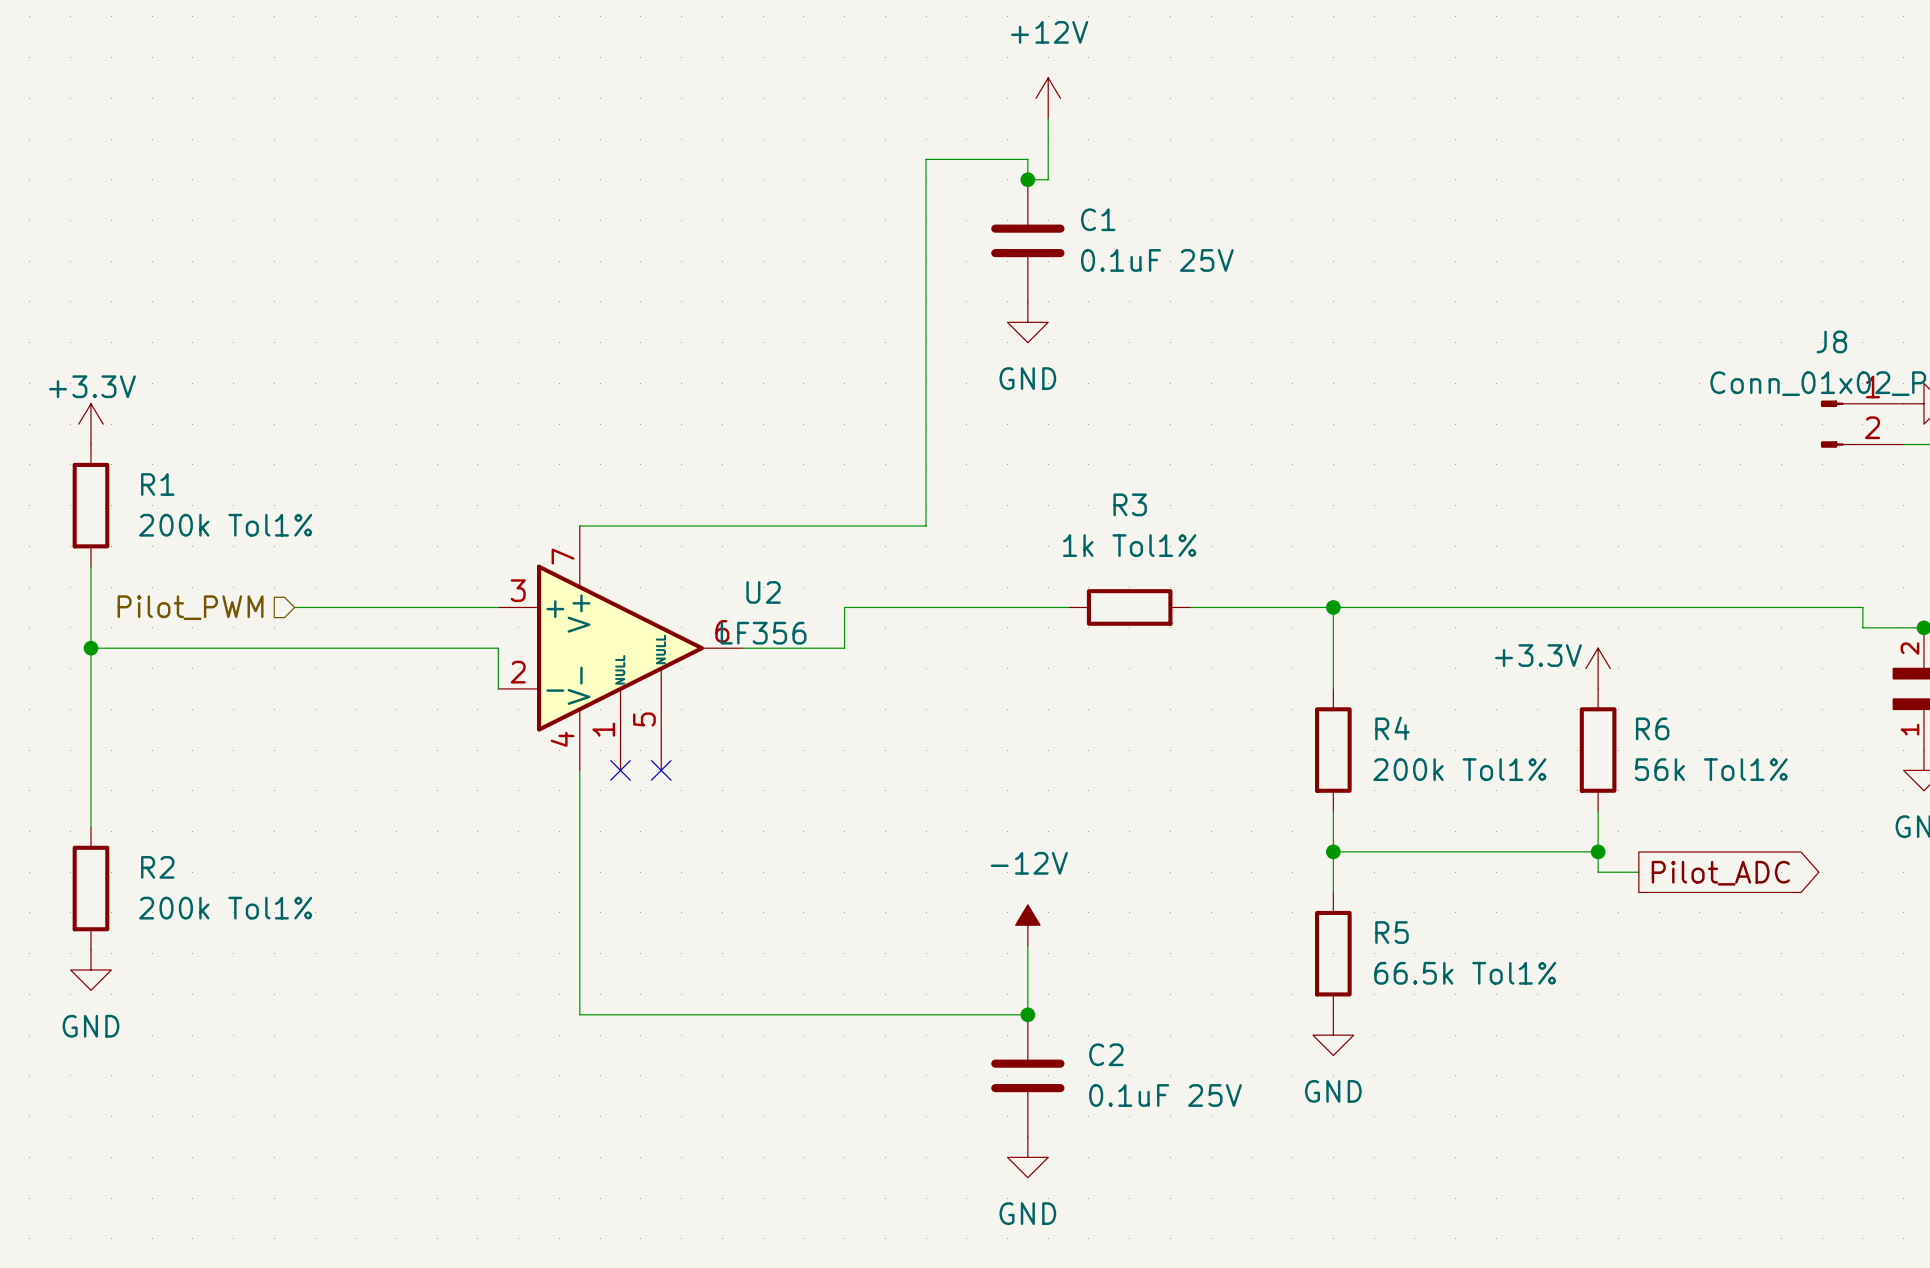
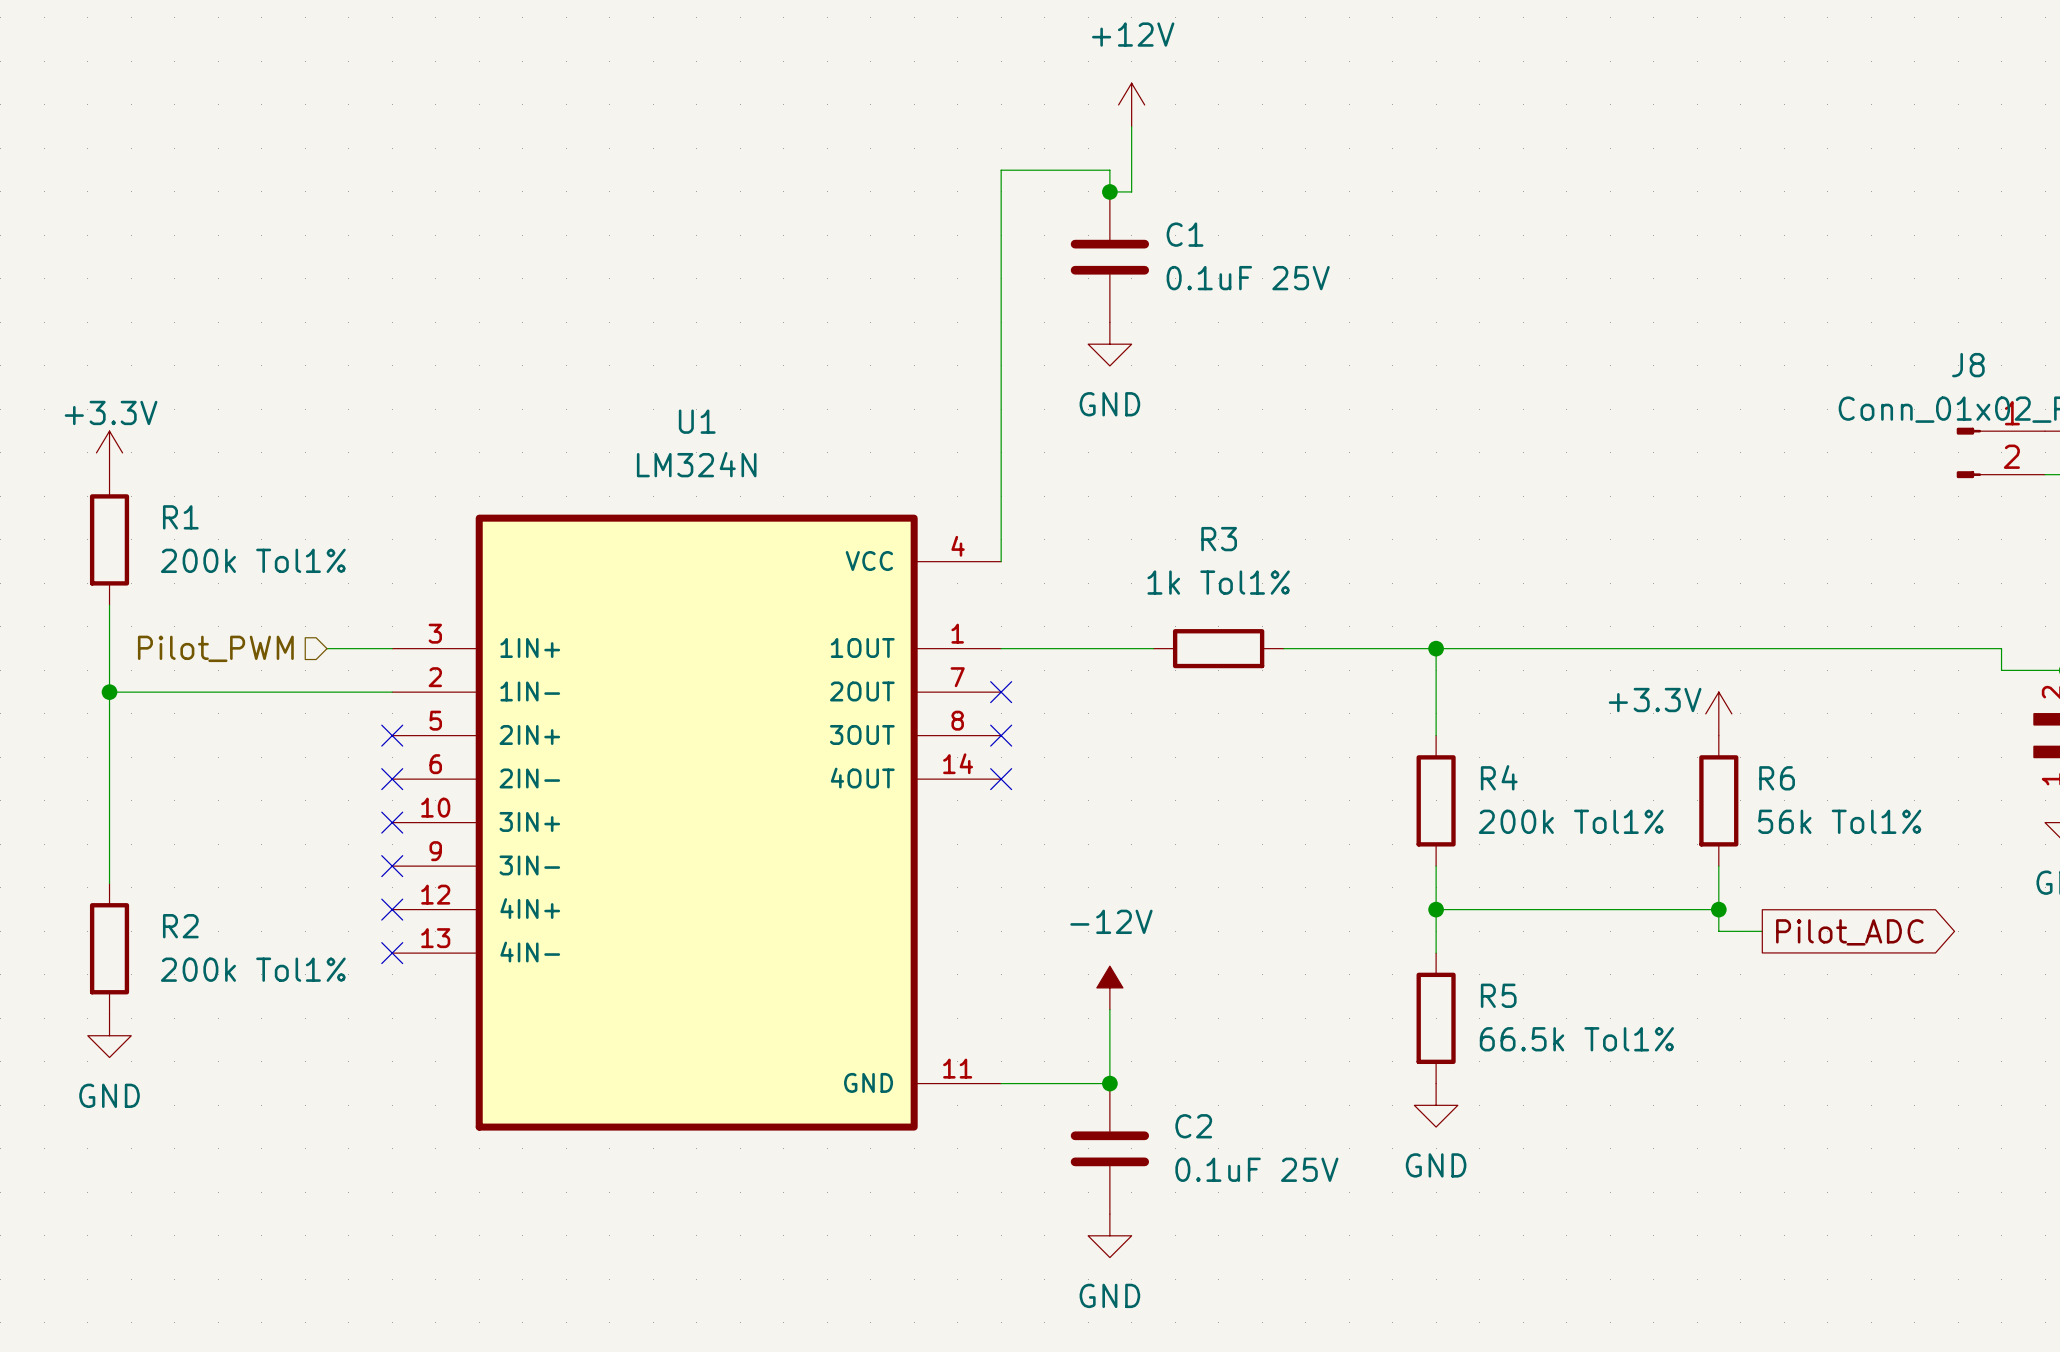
U2: LF356 (620, 648) -> none
no-connect mark: none -> (1001, 692)
no-connect mark: none -> (392, 735)
no-connect mark: none -> (1001, 735)
no-connect mark: none -> (392, 779)
no-connect mark: none -> (1001, 779)
no-connect mark: none -> (392, 822)
no-connect mark: (620, 770) -> none
U1: none -> LM324N (696, 822)
no-connect mark: (661, 770) -> none
no-connect mark: none -> (392, 866)
no-connect mark: none -> (392, 909)
no-connect mark: none -> (392, 953)

